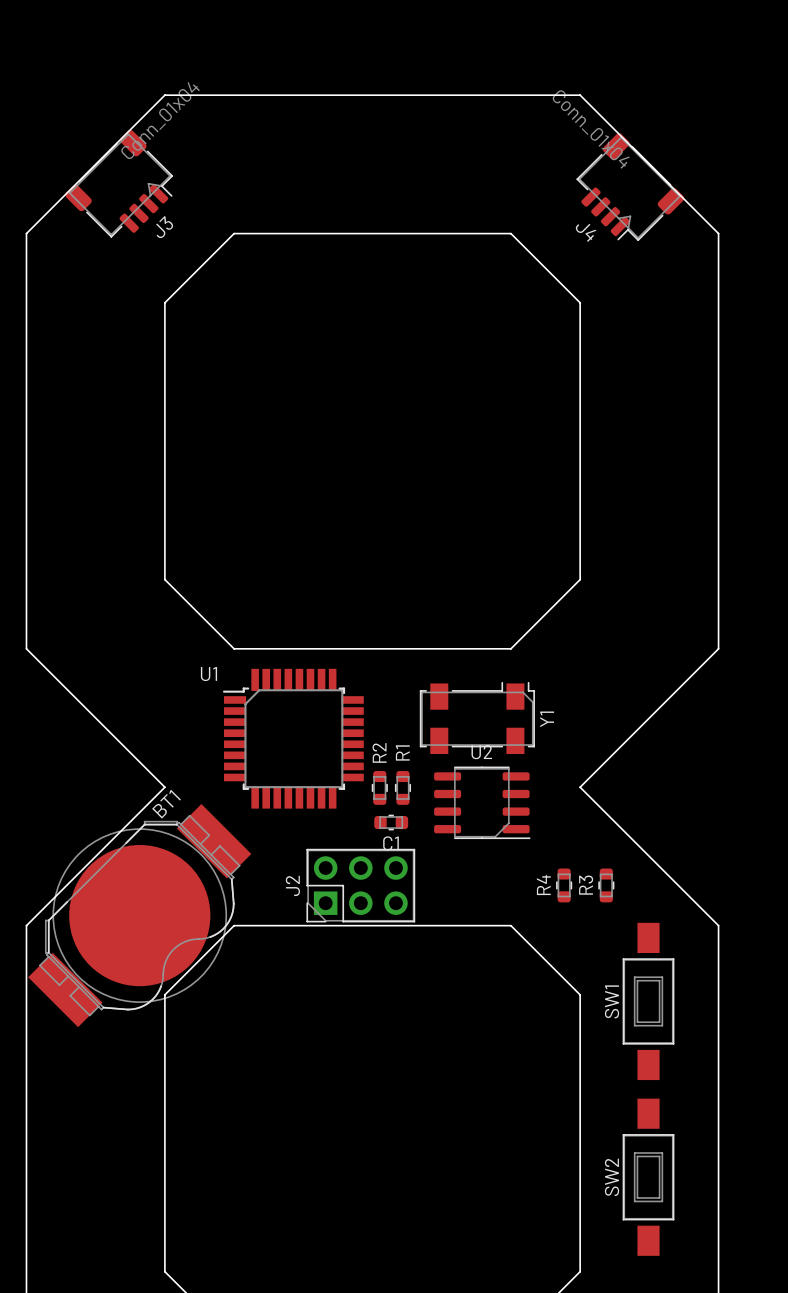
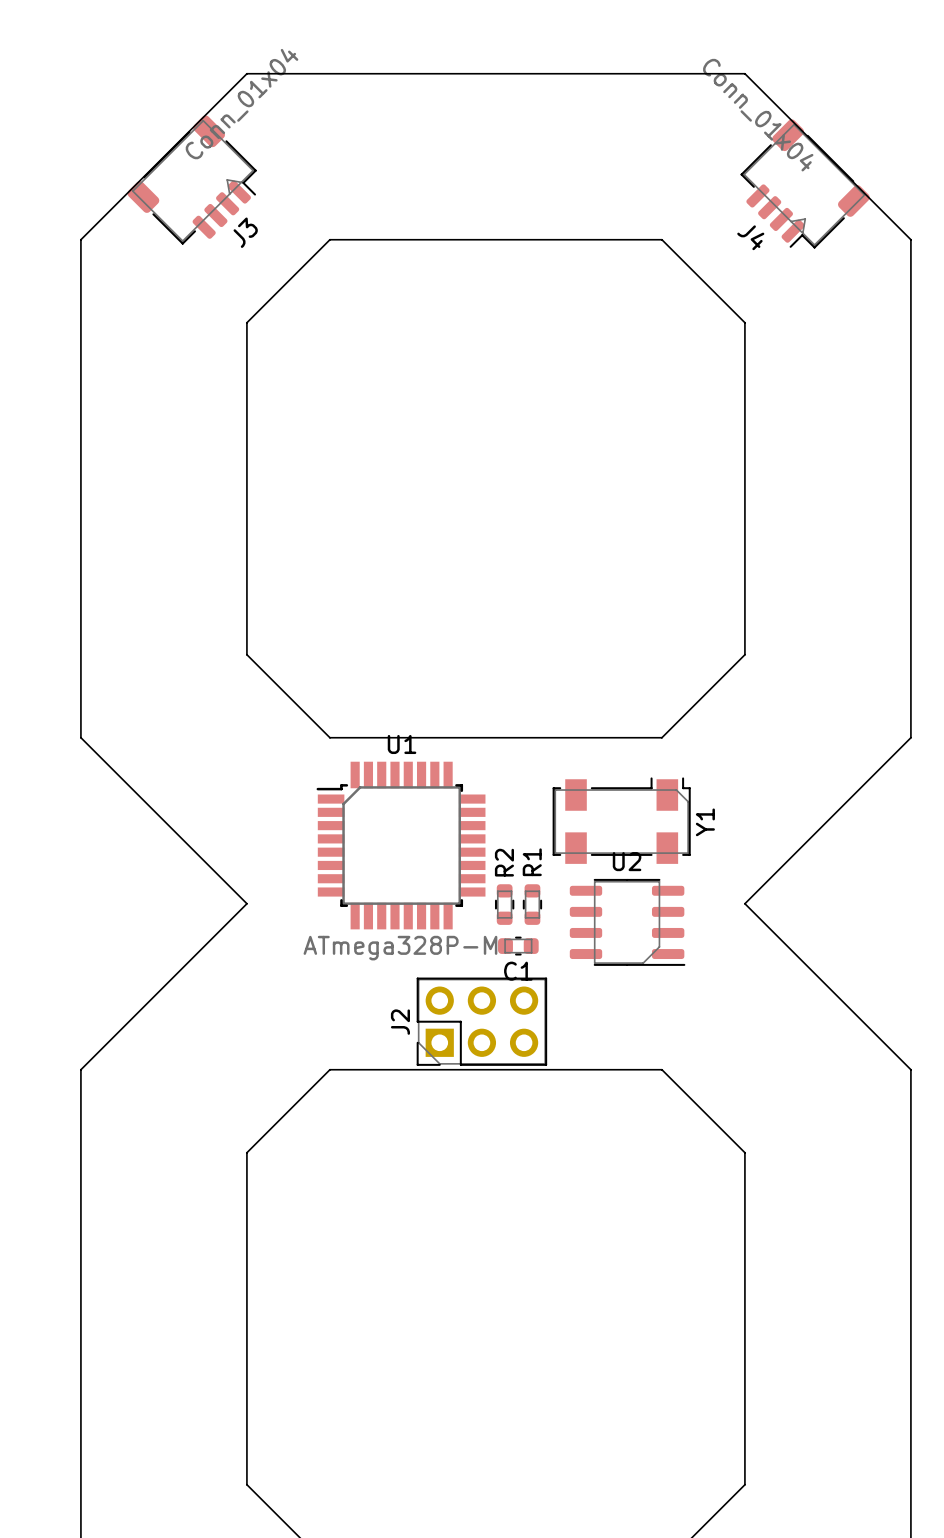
U1 name position: U1 (208, 674) -> U1 (402, 744)
U1 value: none -> ATmega328P-M (400, 948)
R4: (564, 885) -> none
R3: (606, 885) -> none
BT1: (139, 915) -> none
SW1: (648, 1001) -> none
SW2: (648, 1177) -> none

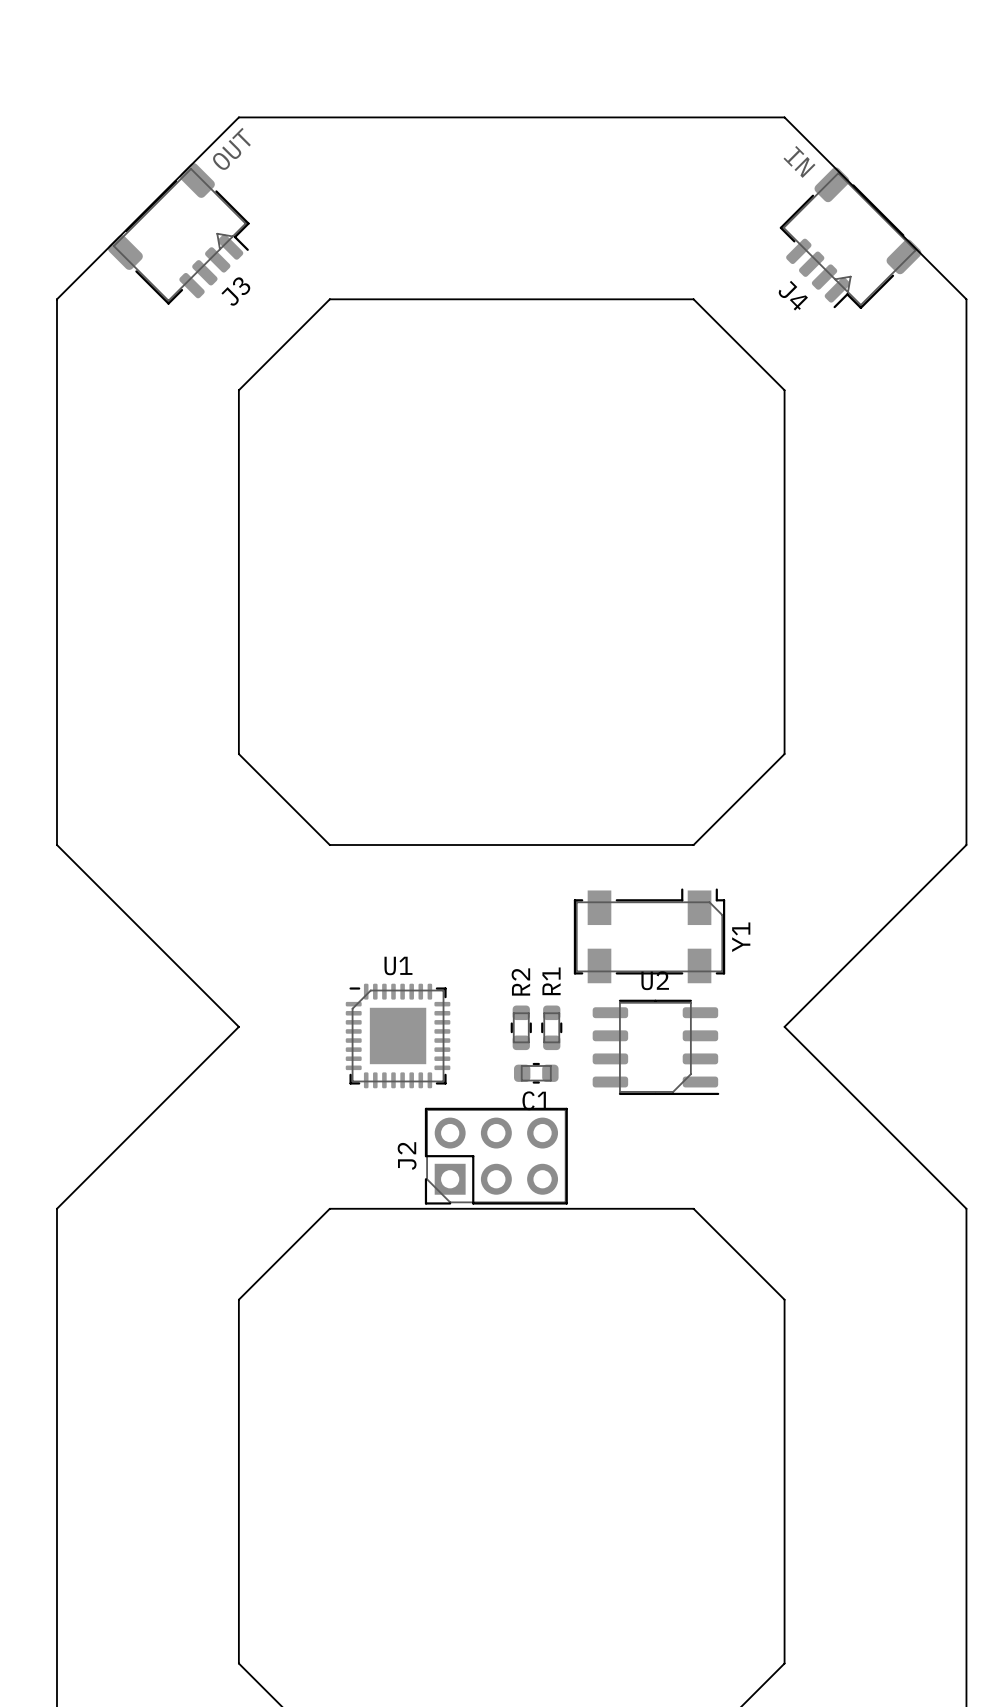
J3 value: Conn_01x04 (242, 104) -> OUT (231, 148)
J4 value: Conn_01x04 (758, 115) -> IN (799, 161)
U1 name position: U1 (402, 744) -> U1 (398, 965)
U1 footprint: [316, 761, 486, 930] -> [345, 983, 451, 1089]
U1 value: ATmega328P-M (400, 948) -> none

